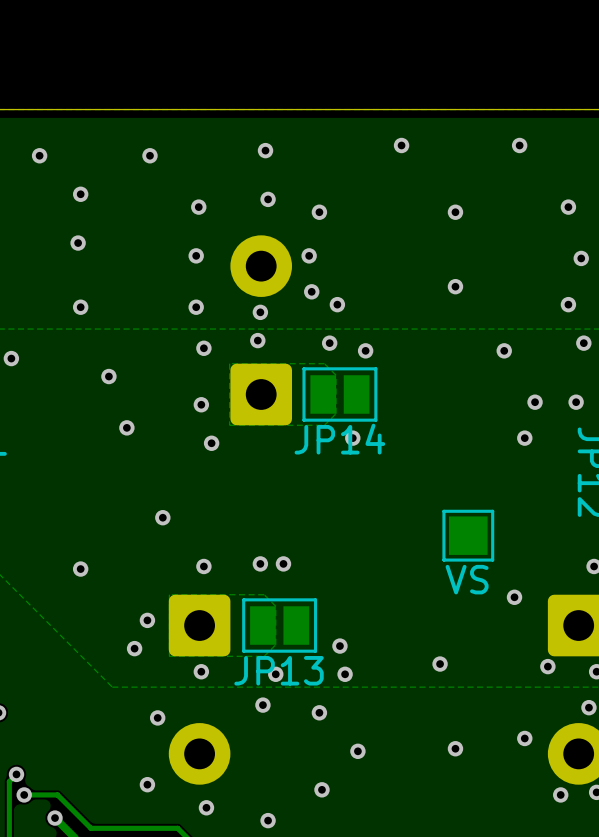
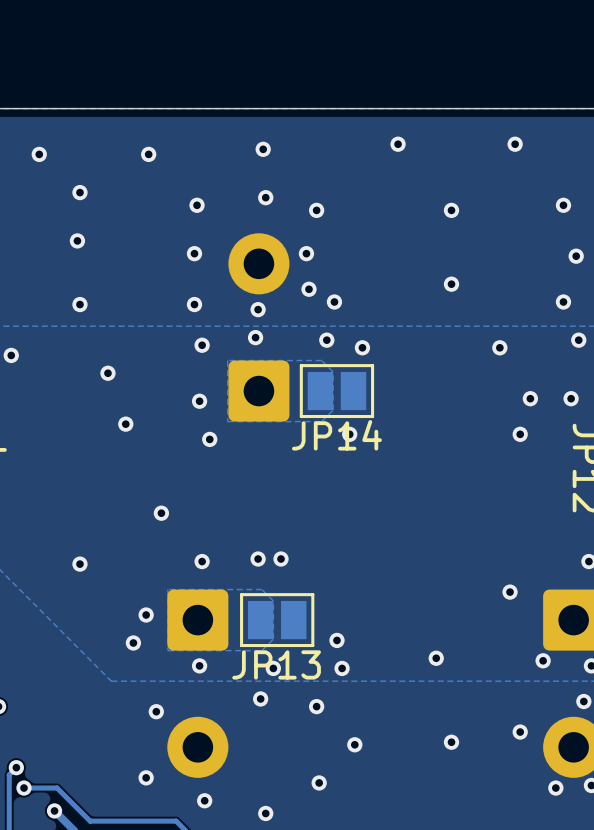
part: VS (468, 535) -> none

